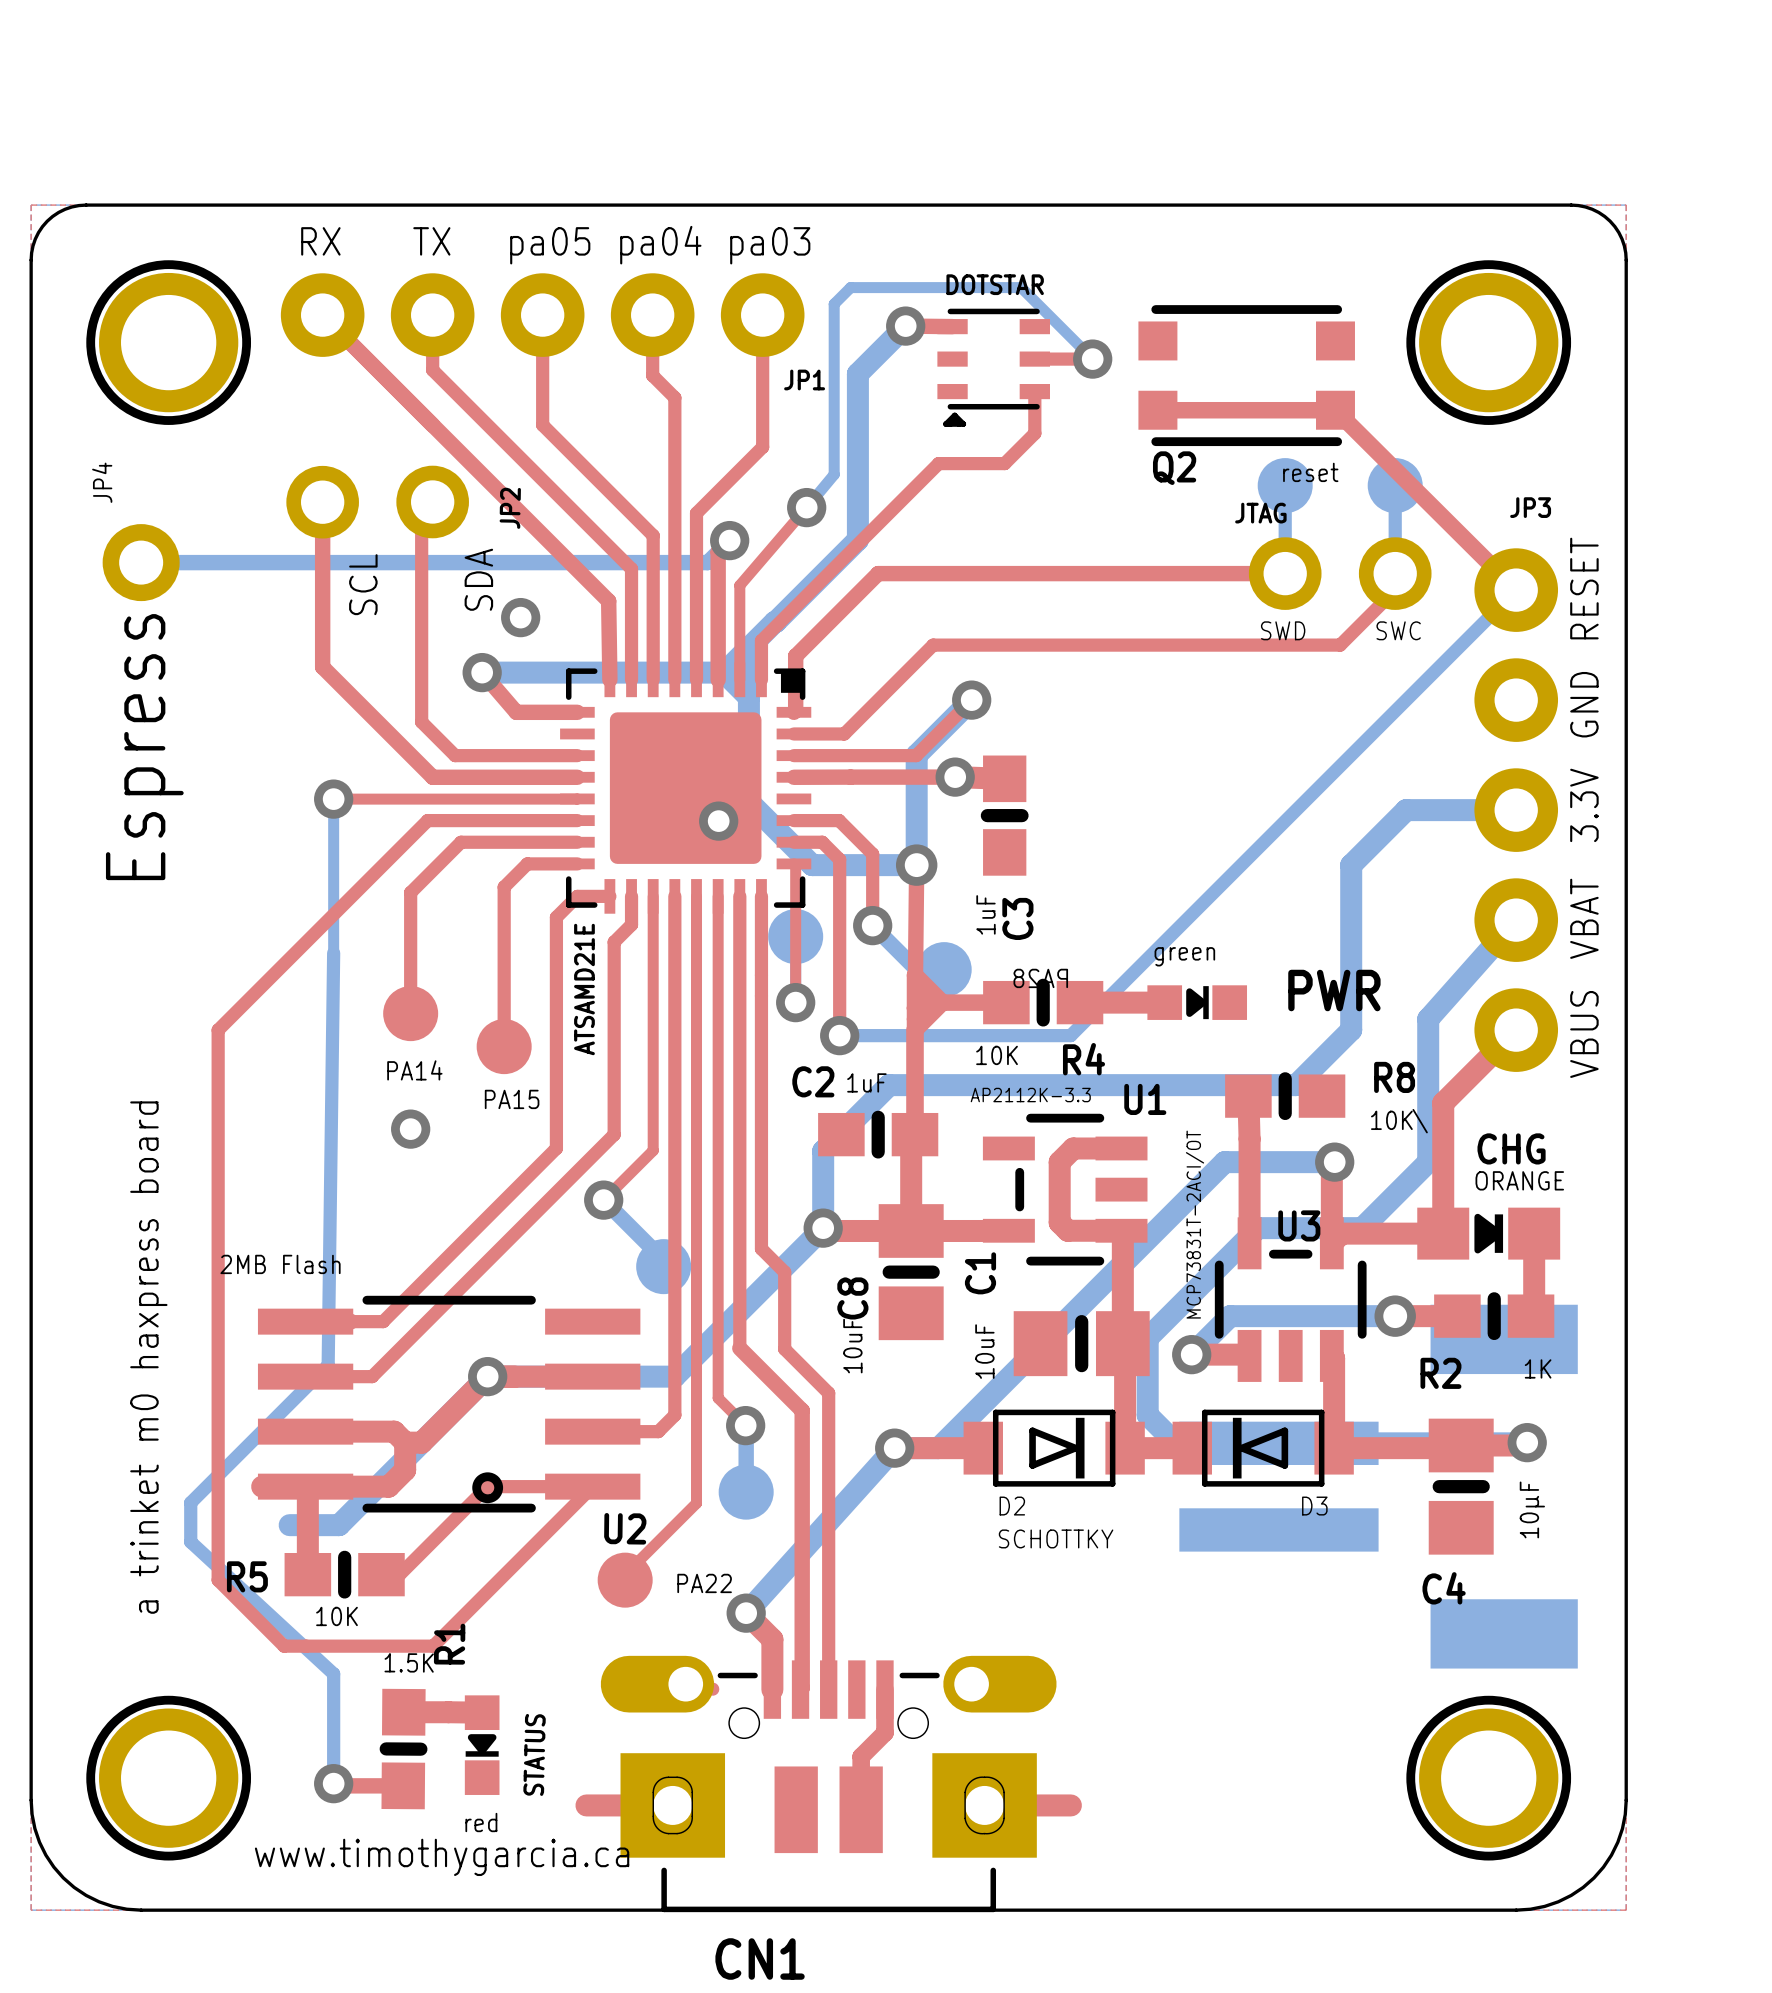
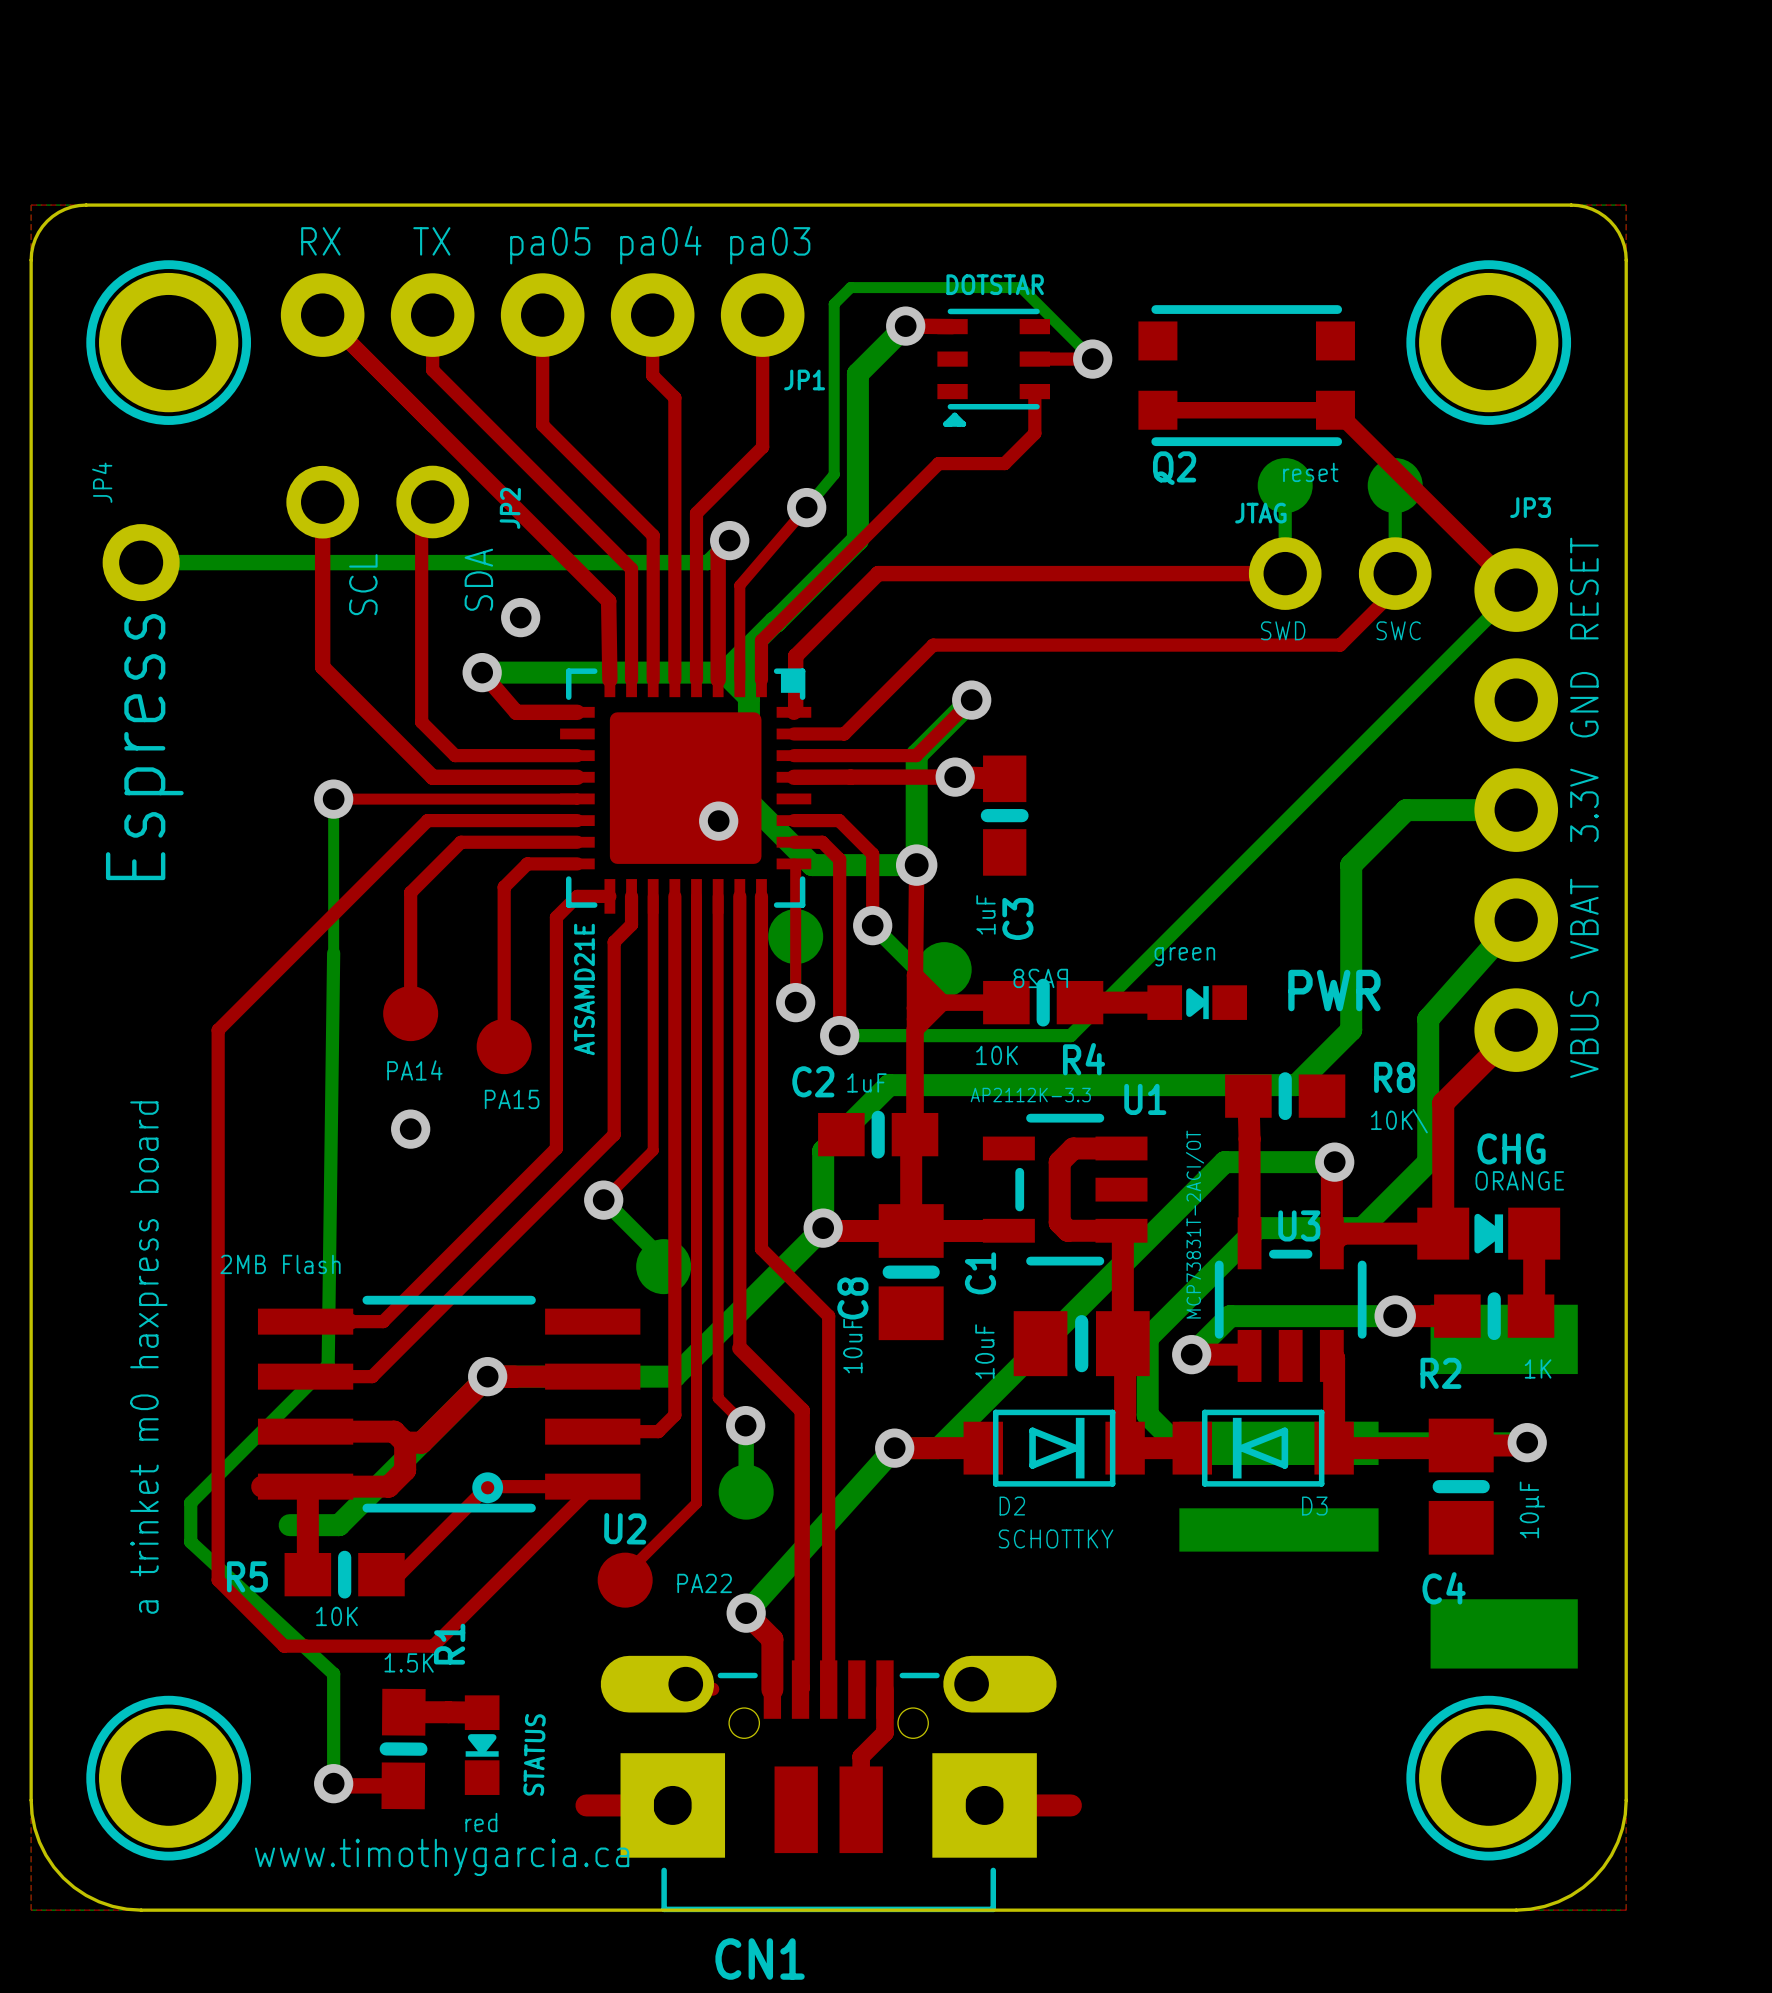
top track: (784, 1272) (784, 1349) (828, 1393) -> (784, 1272) (828, 1316) (828, 1393)

